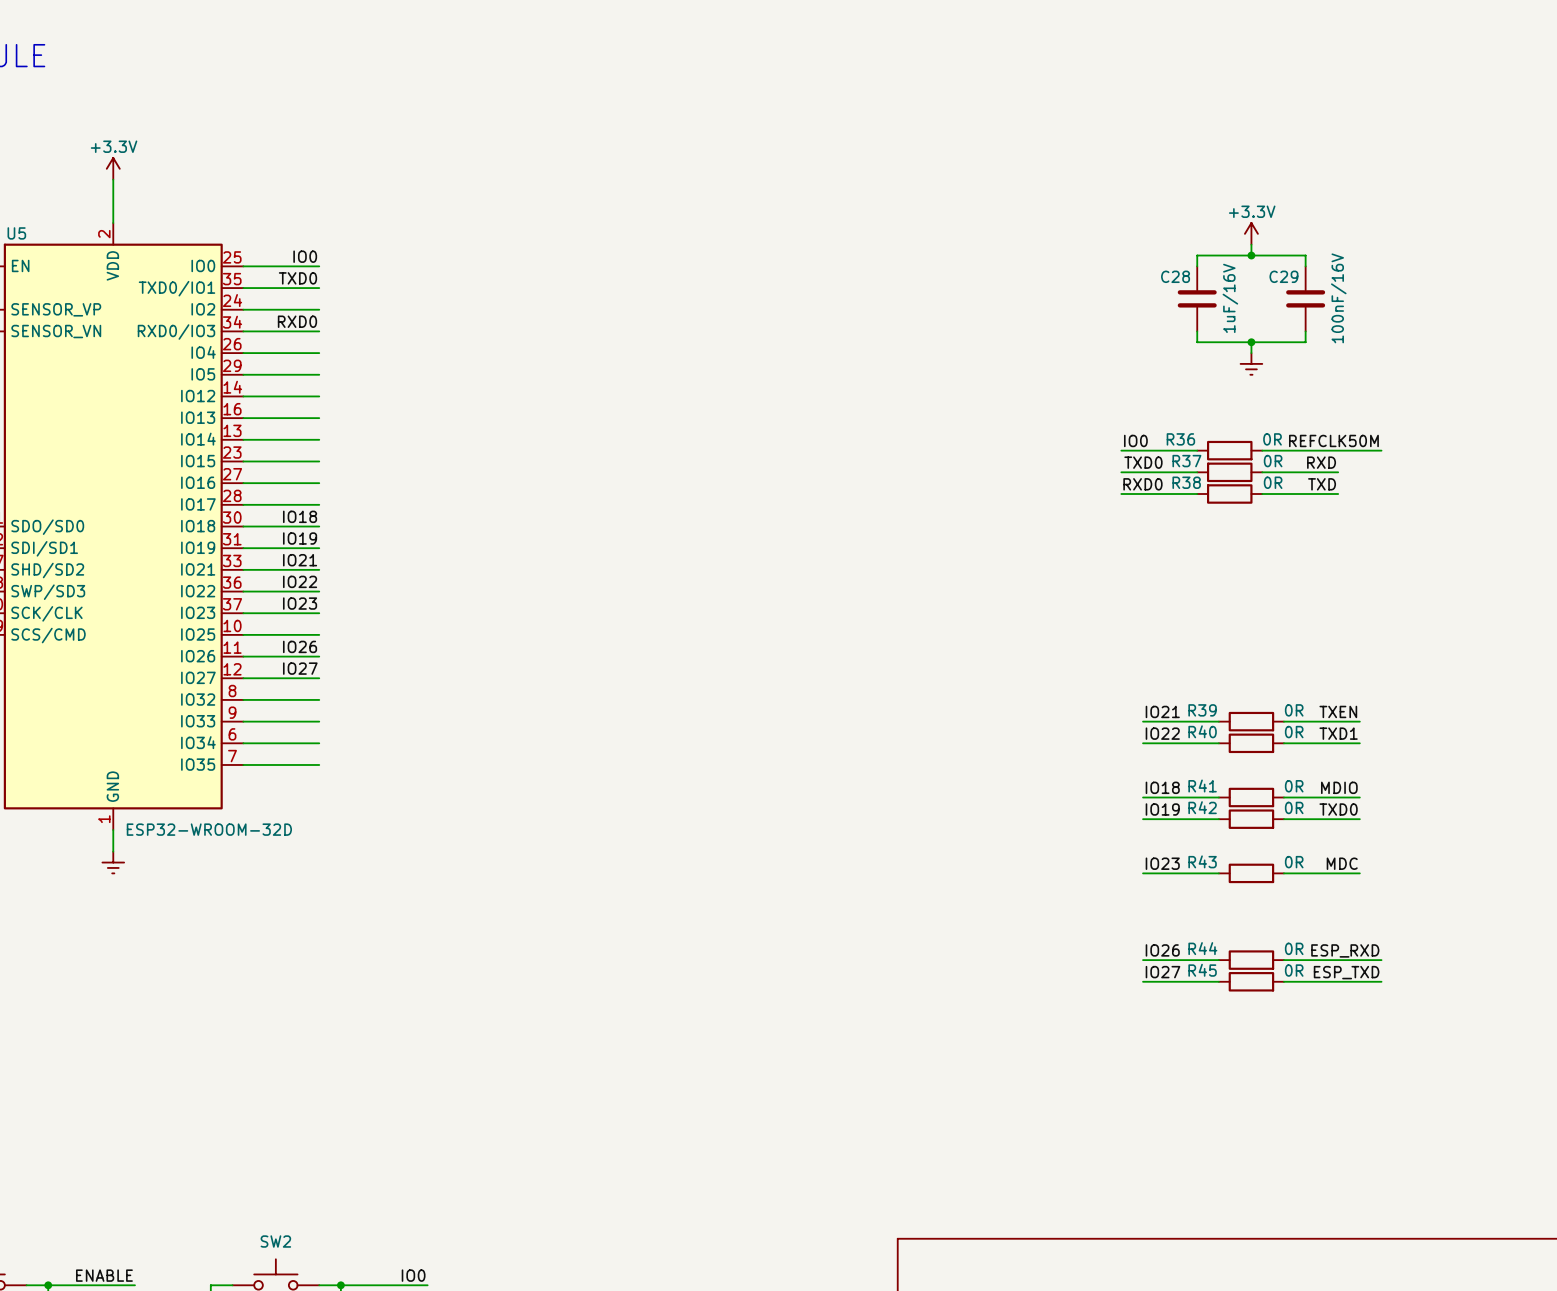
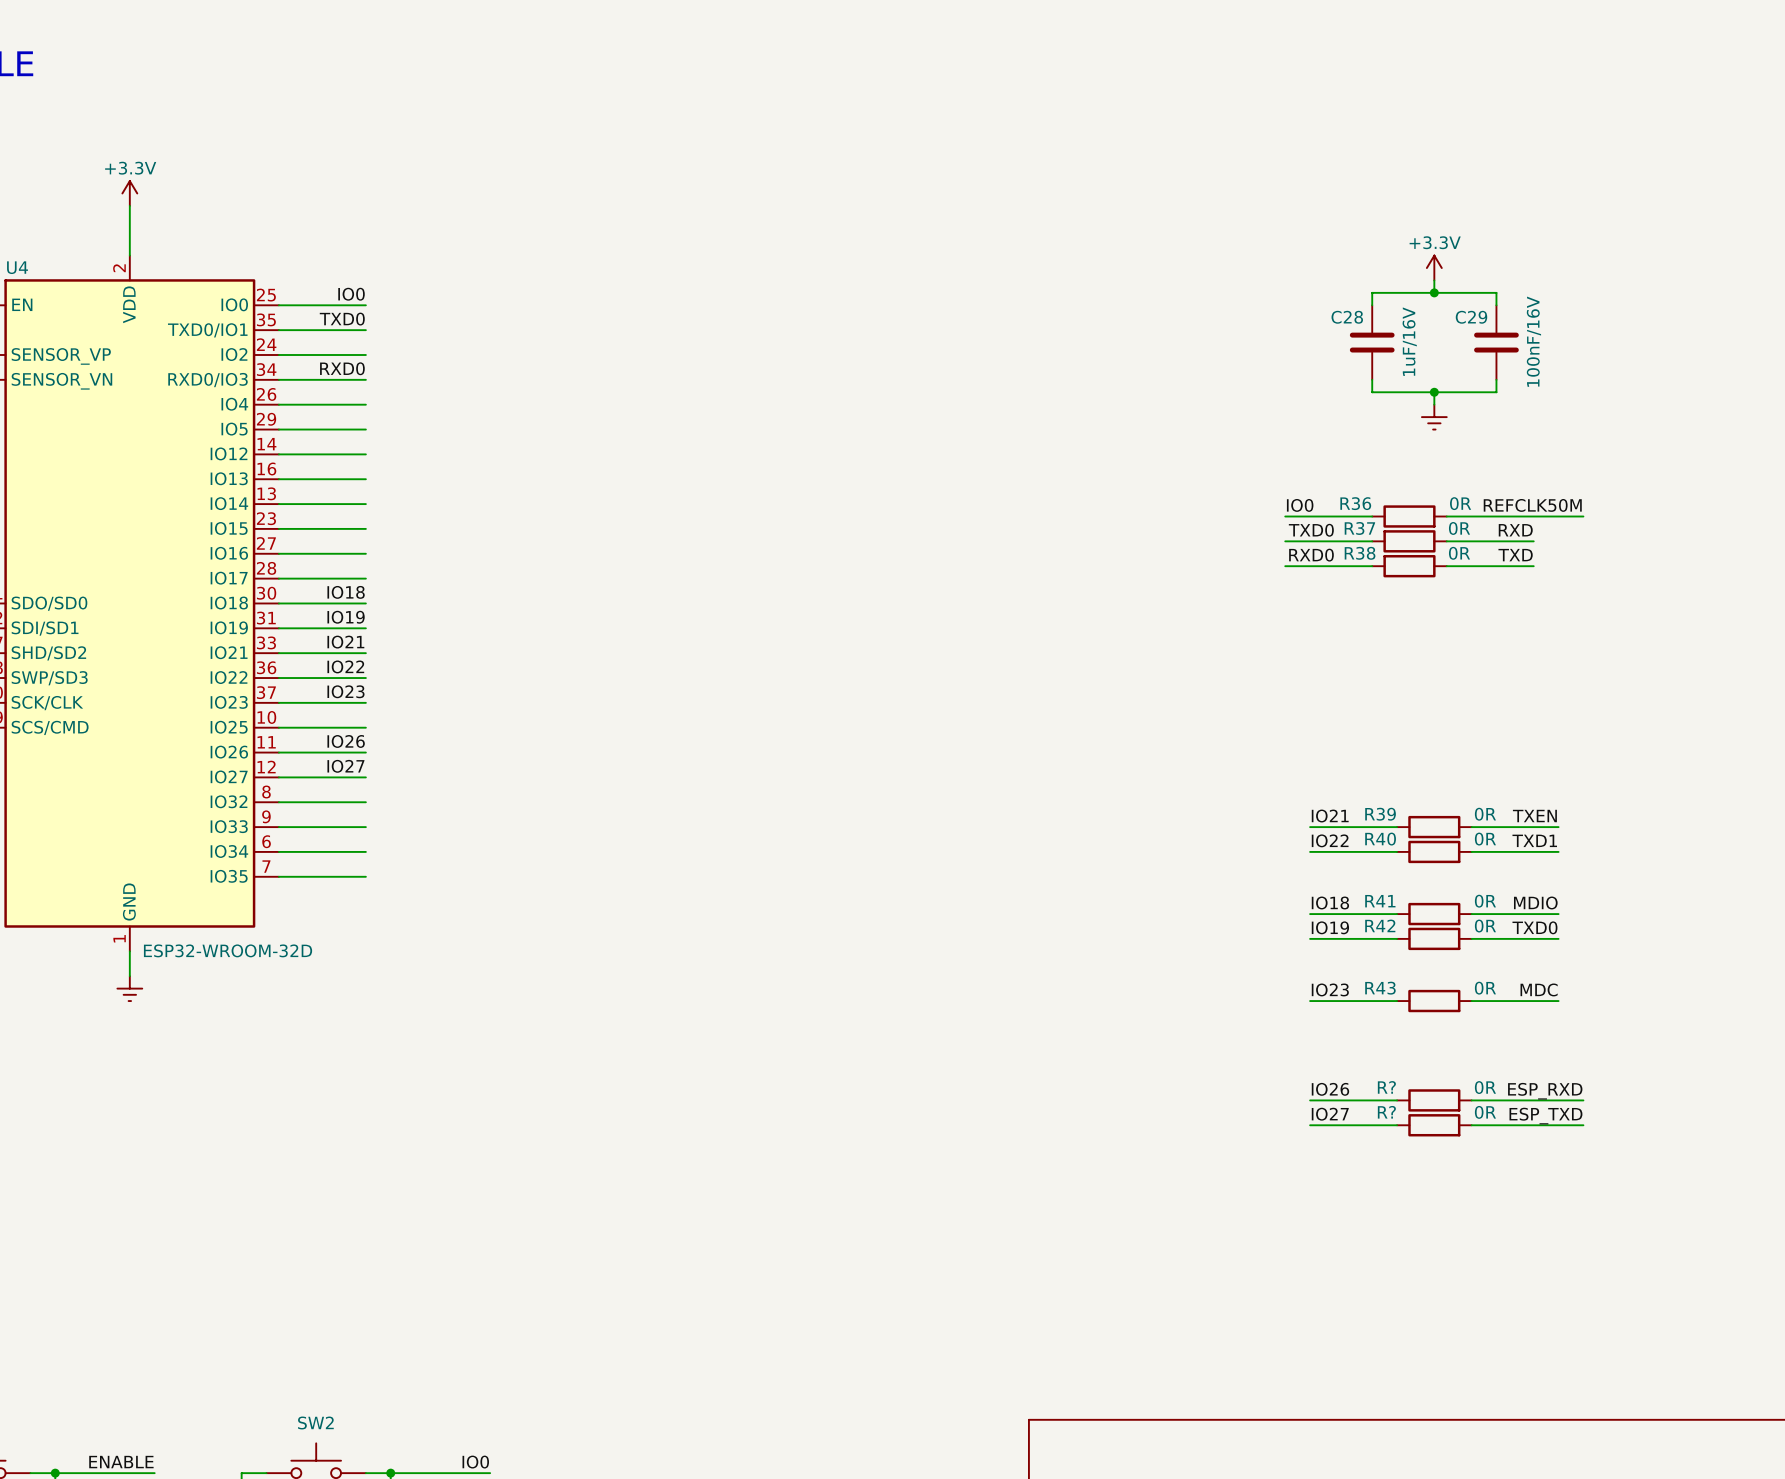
U5 name: U5 (16, 233) -> U4 (17, 267)
R44 name: R44 (1202, 948) -> R? (1386, 1087)
R45 name: R45 (1202, 970) -> R? (1386, 1112)

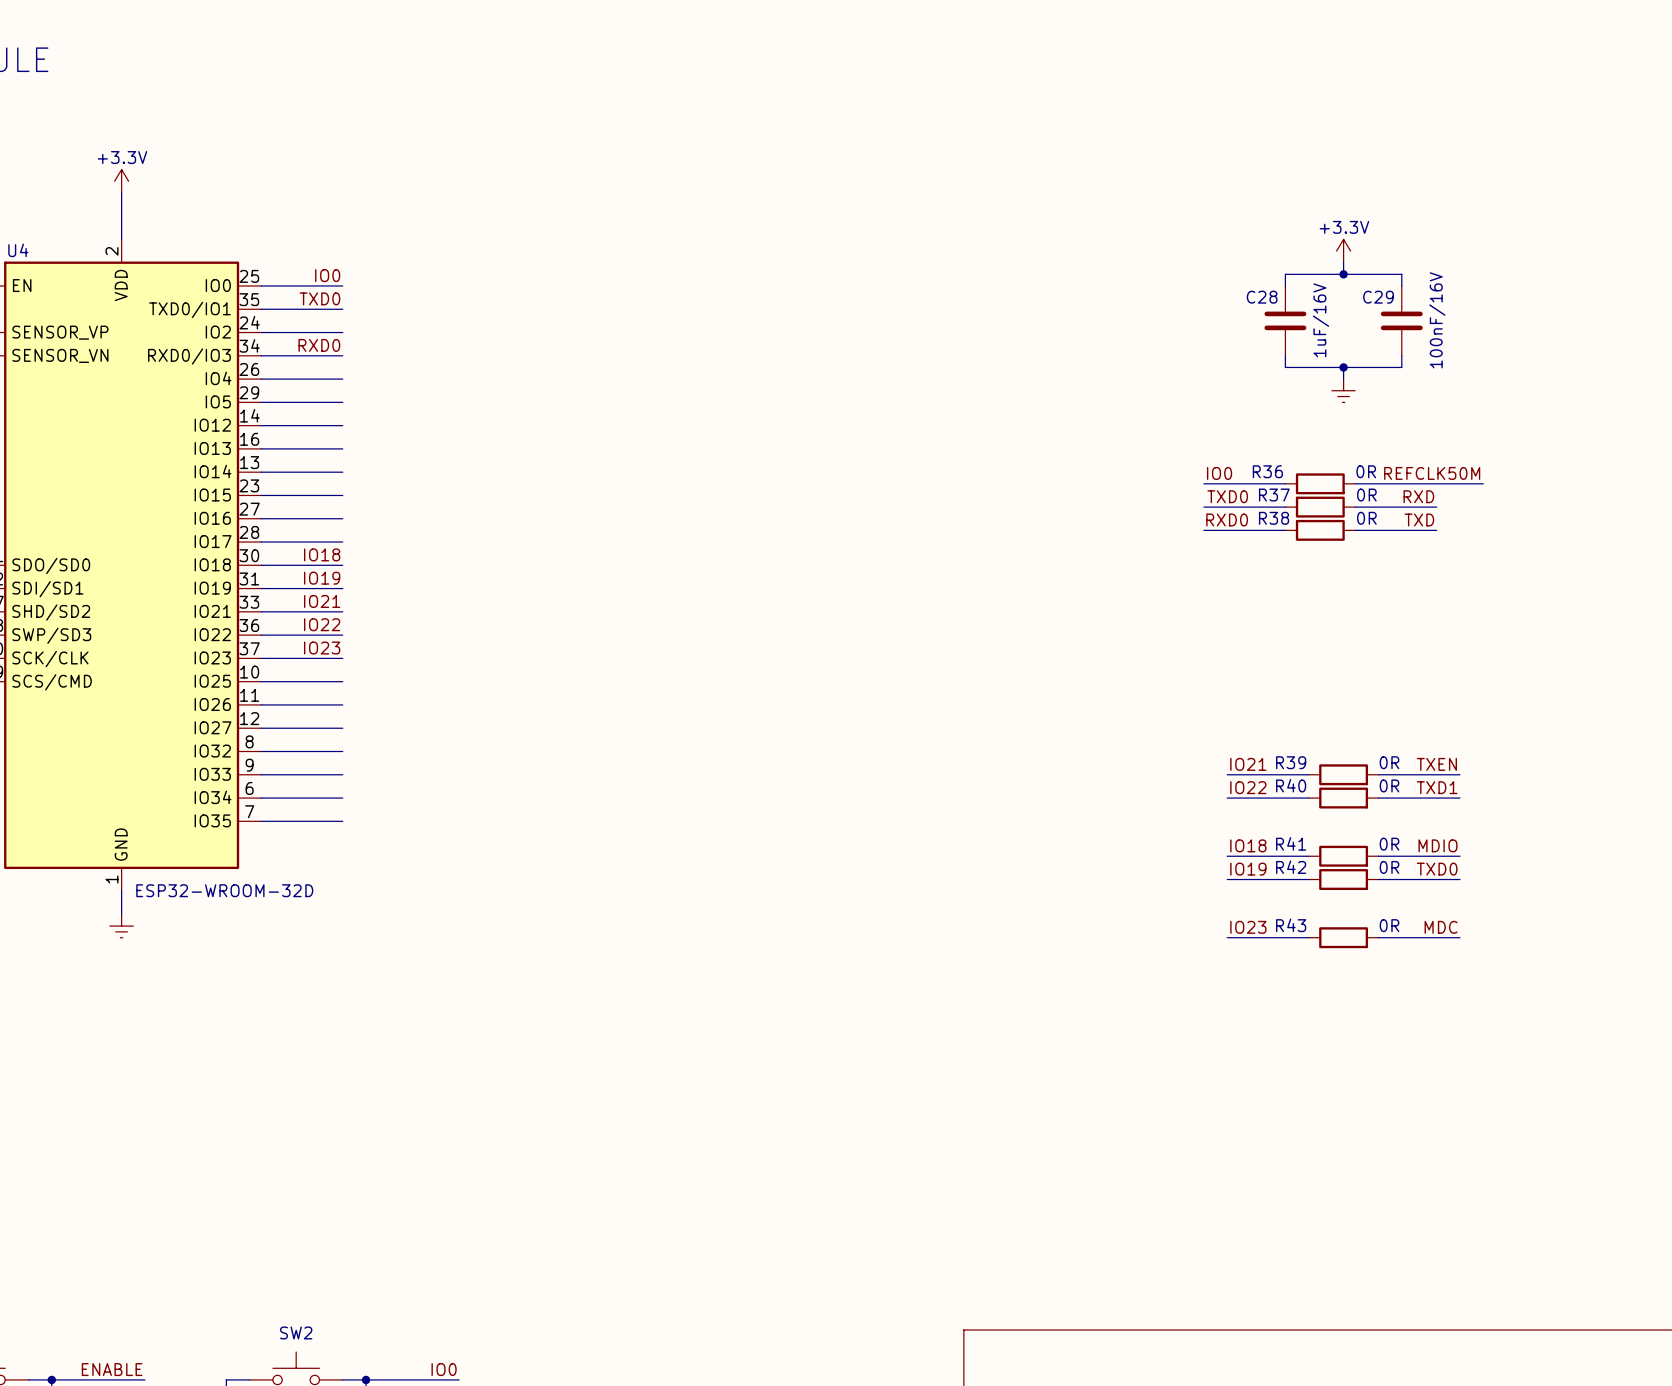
label: IO26 (346, 741) -> none
label: IO27 (345, 766) -> none
label: IO26 (1330, 1089) -> none
label: ESP_RXD (1545, 1091) -> none
wire: (1310, 1100) (1397, 1100) -> none
R?: 0R (1434, 1100) -> none
wire: (1471, 1100) (1583, 1100) -> none
label: IO27 (1330, 1114) -> none
label: ESP_TXD (1545, 1116) -> none
wire: (1310, 1125) (1397, 1125) -> none
R?: 0R (1434, 1125) -> none
wire: (1471, 1125) (1583, 1125) -> none

